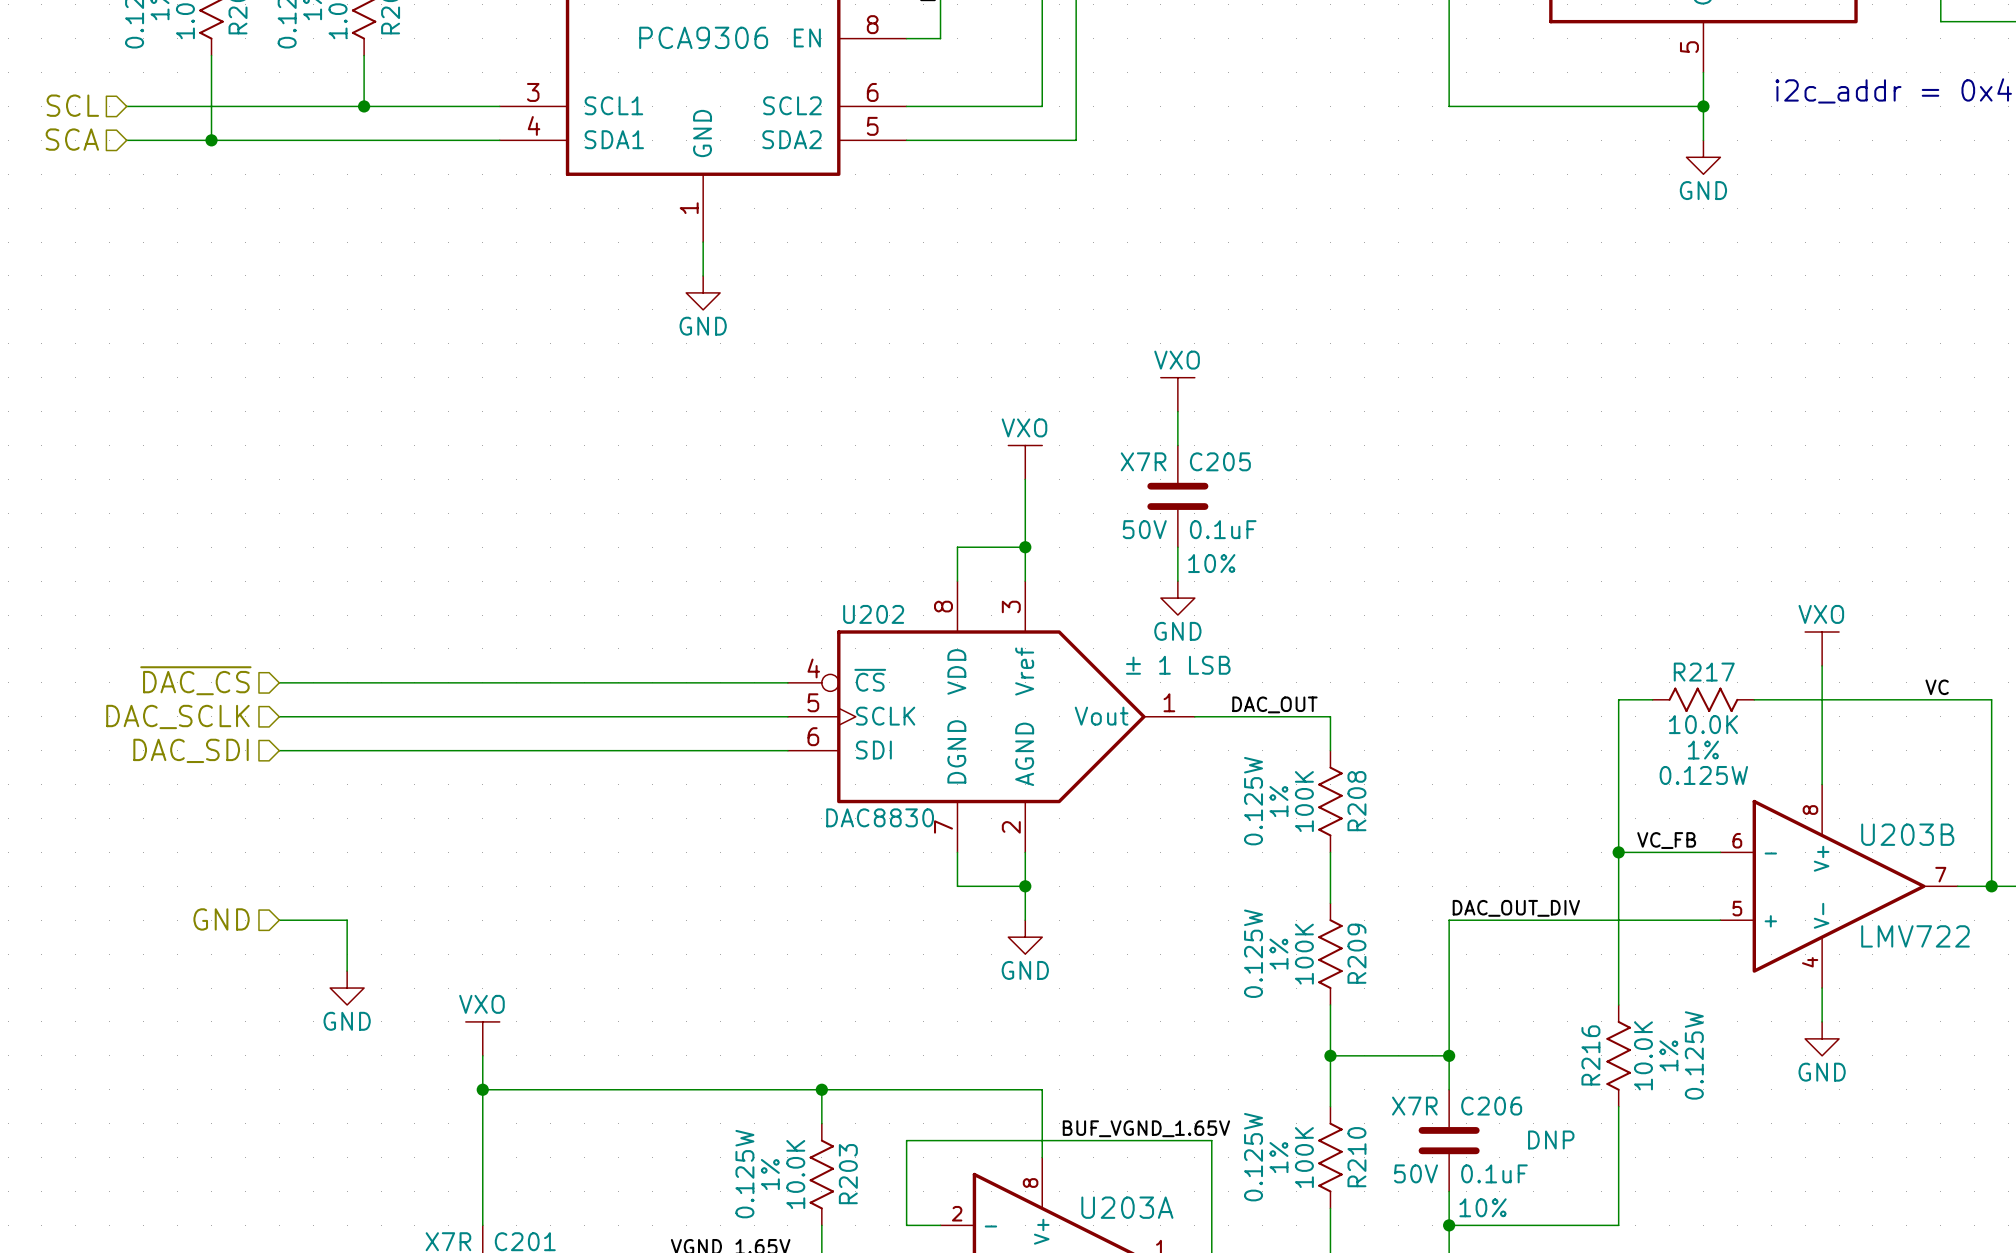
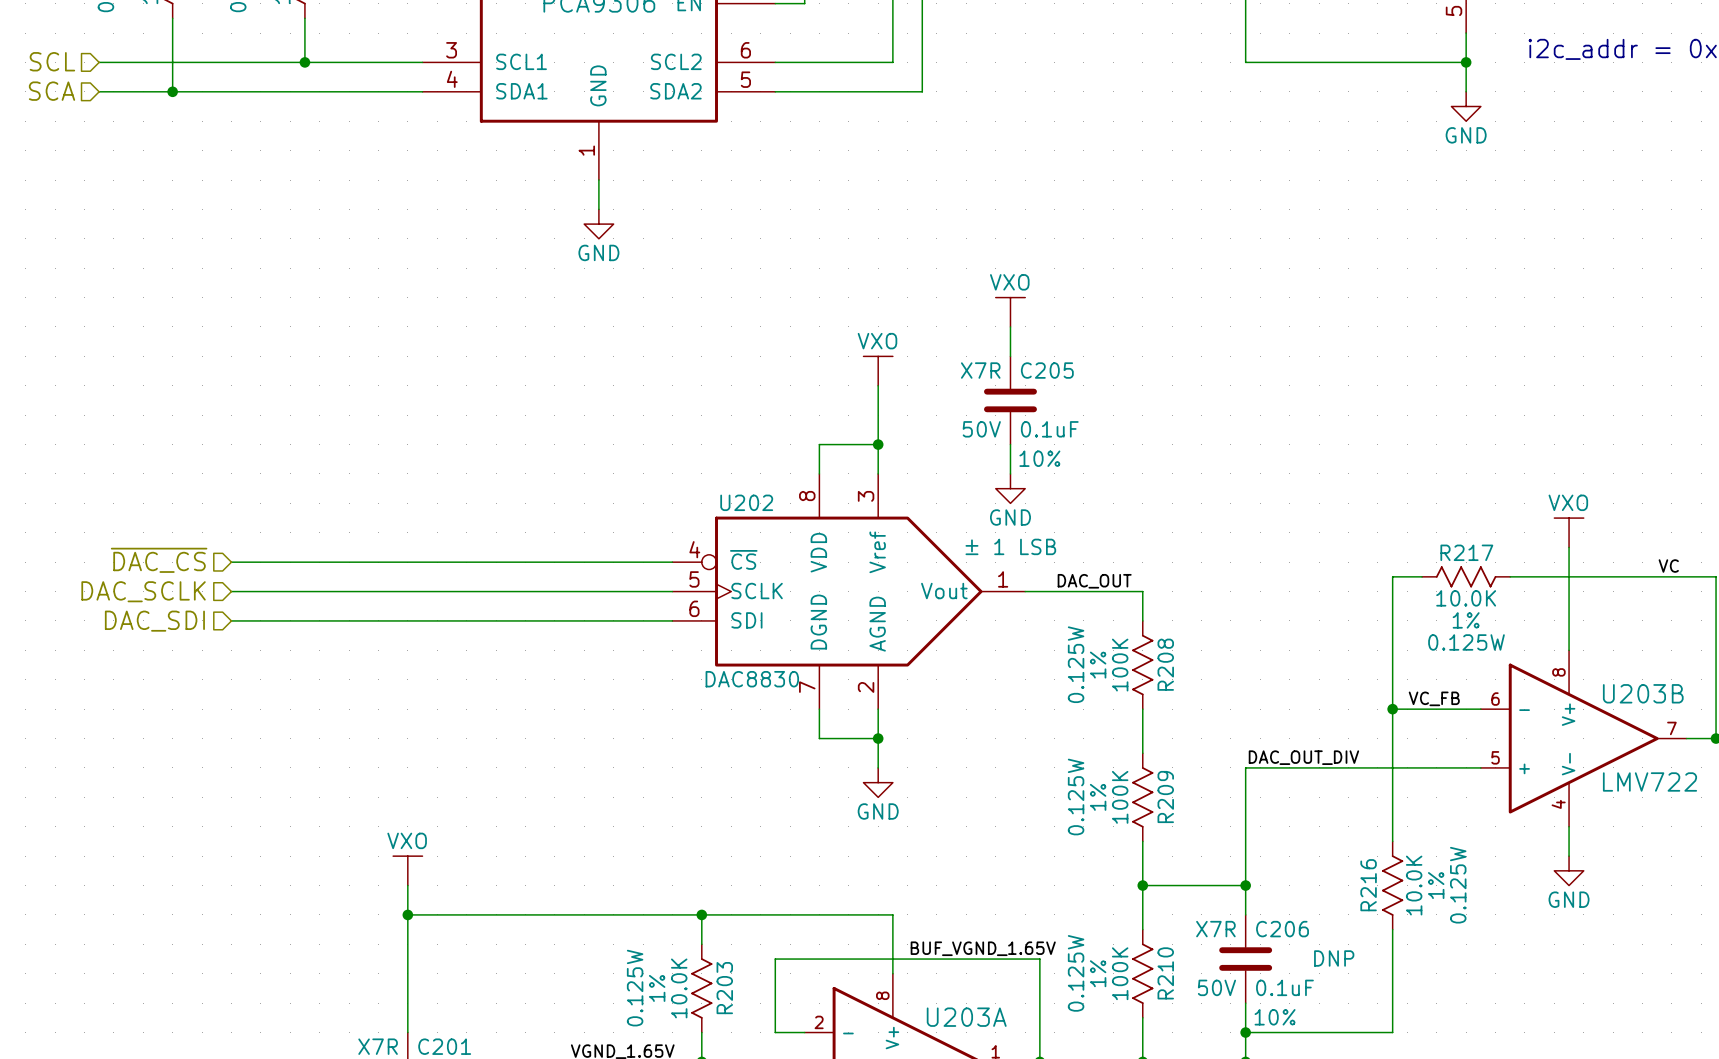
hierarchical label: GND (221, 919) -> none
wire: (279, 920) (347, 920) (347, 971) -> none
power symbol: GND (347, 988) -> none

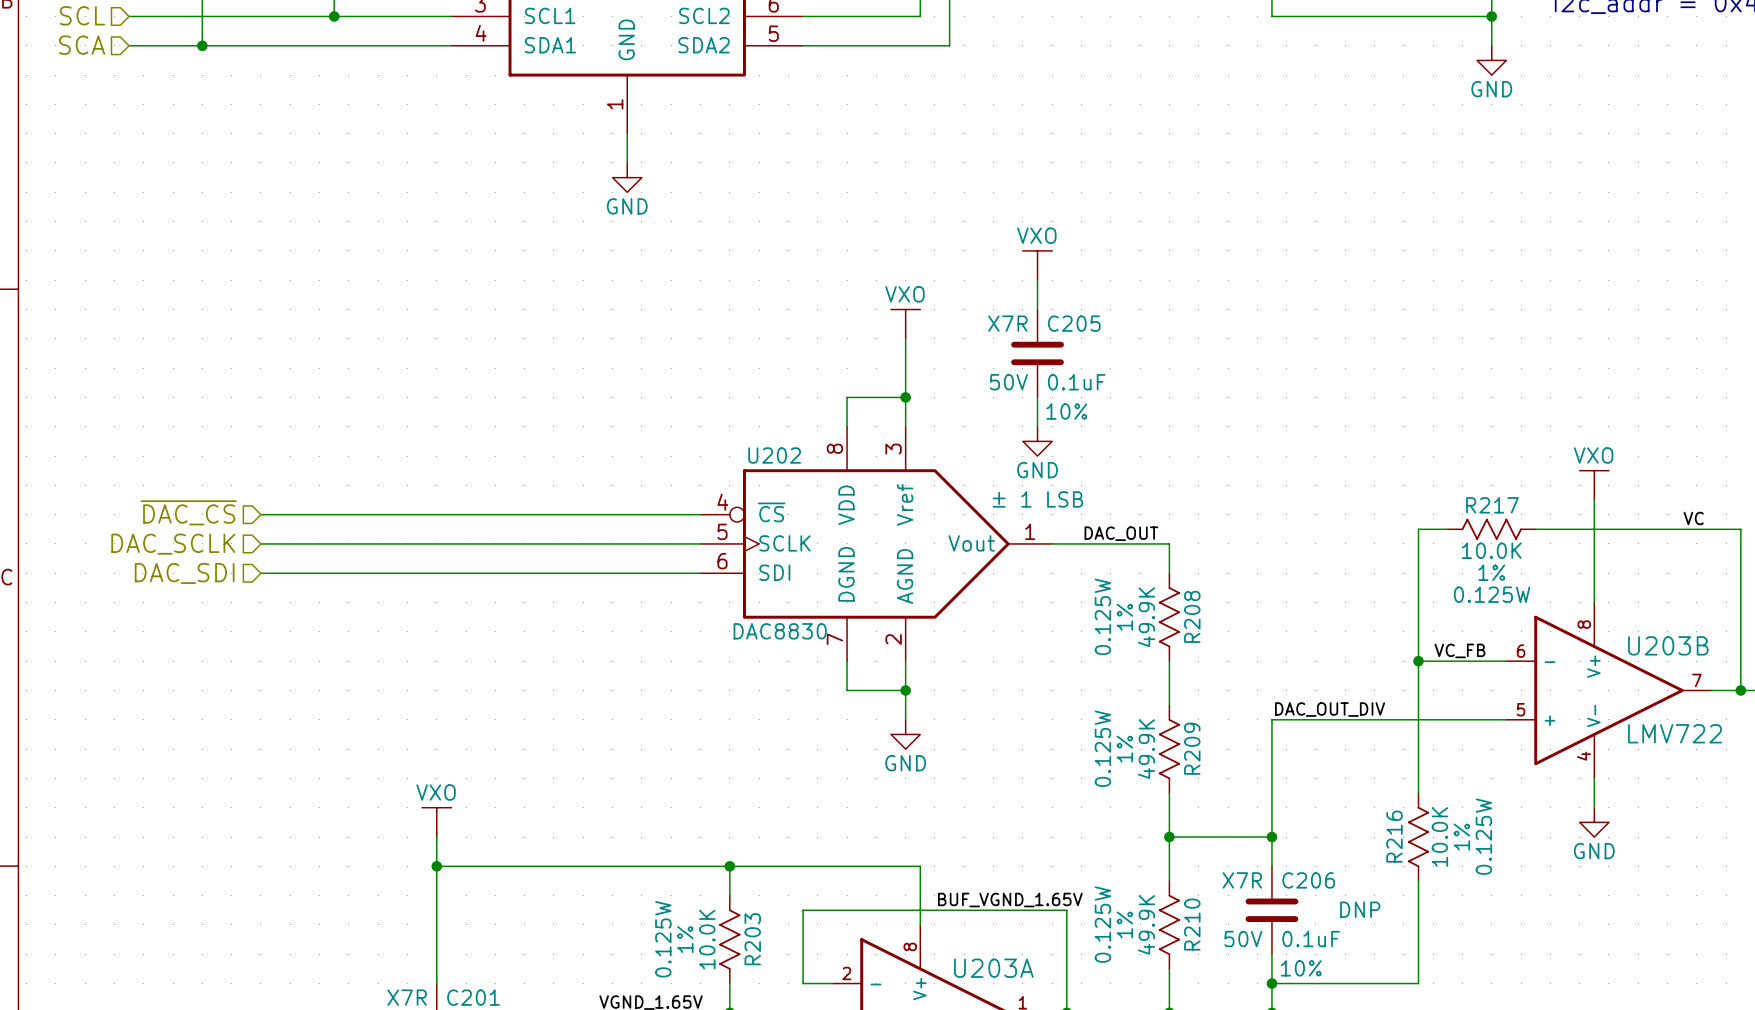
R208 value: 100K (1120, 665) -> 49.9K (1146, 617)
R209 value: 100K (1120, 797) -> 49.9K (1146, 749)
R210 value: 100K (1120, 973) -> 49.9K (1146, 924)

